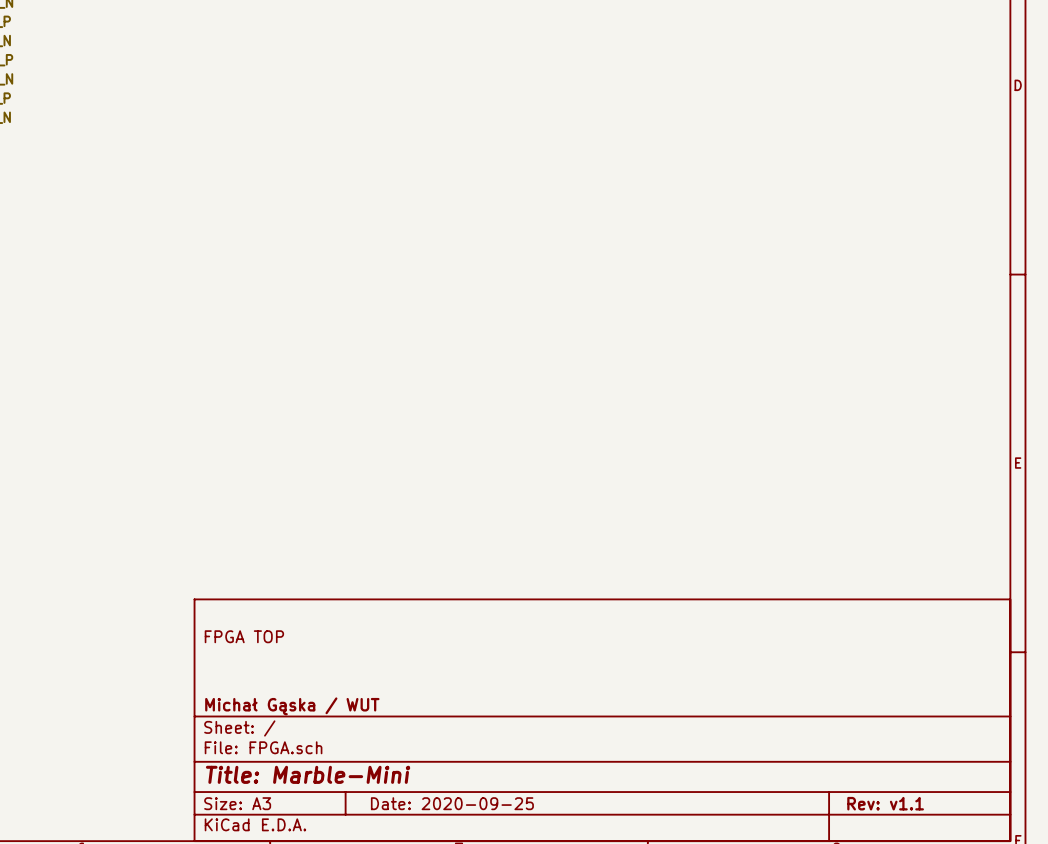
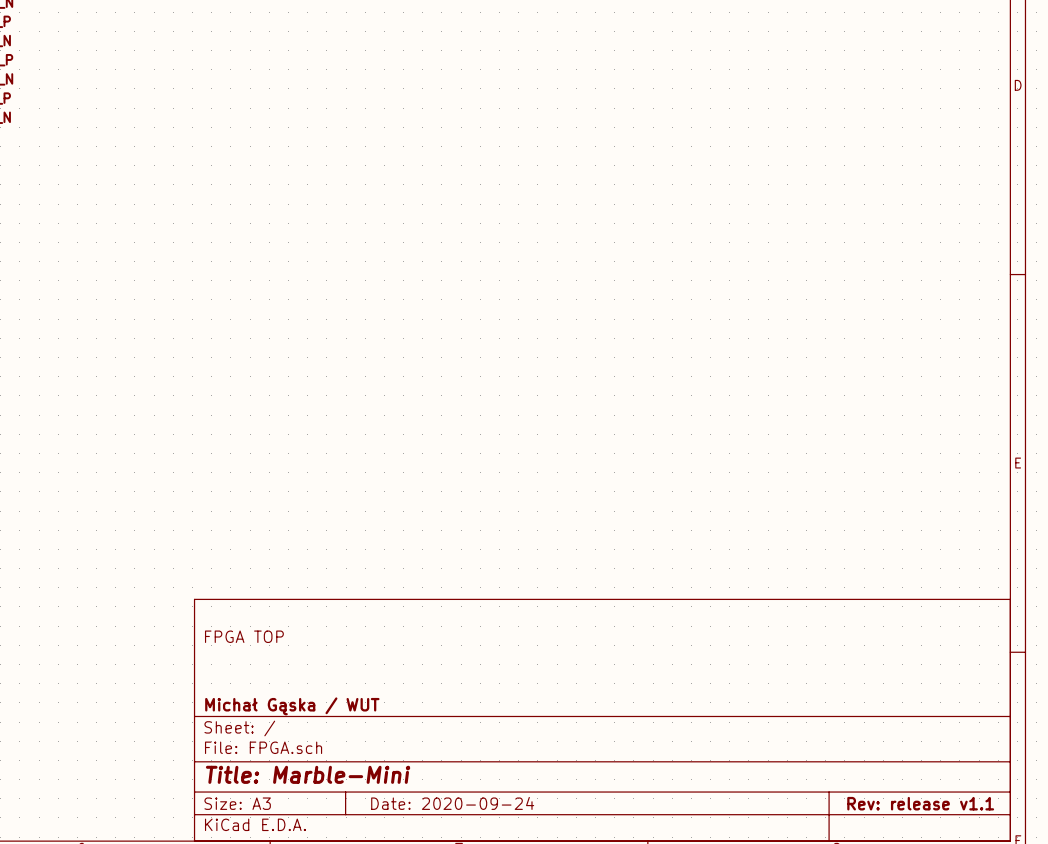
title block: Date: 2020-09-25 (452, 803) -> Date: 2020-09-24 (452, 803)
title block: Rev: v1.1 (885, 803) -> Rev: release v1.1 (920, 803)

